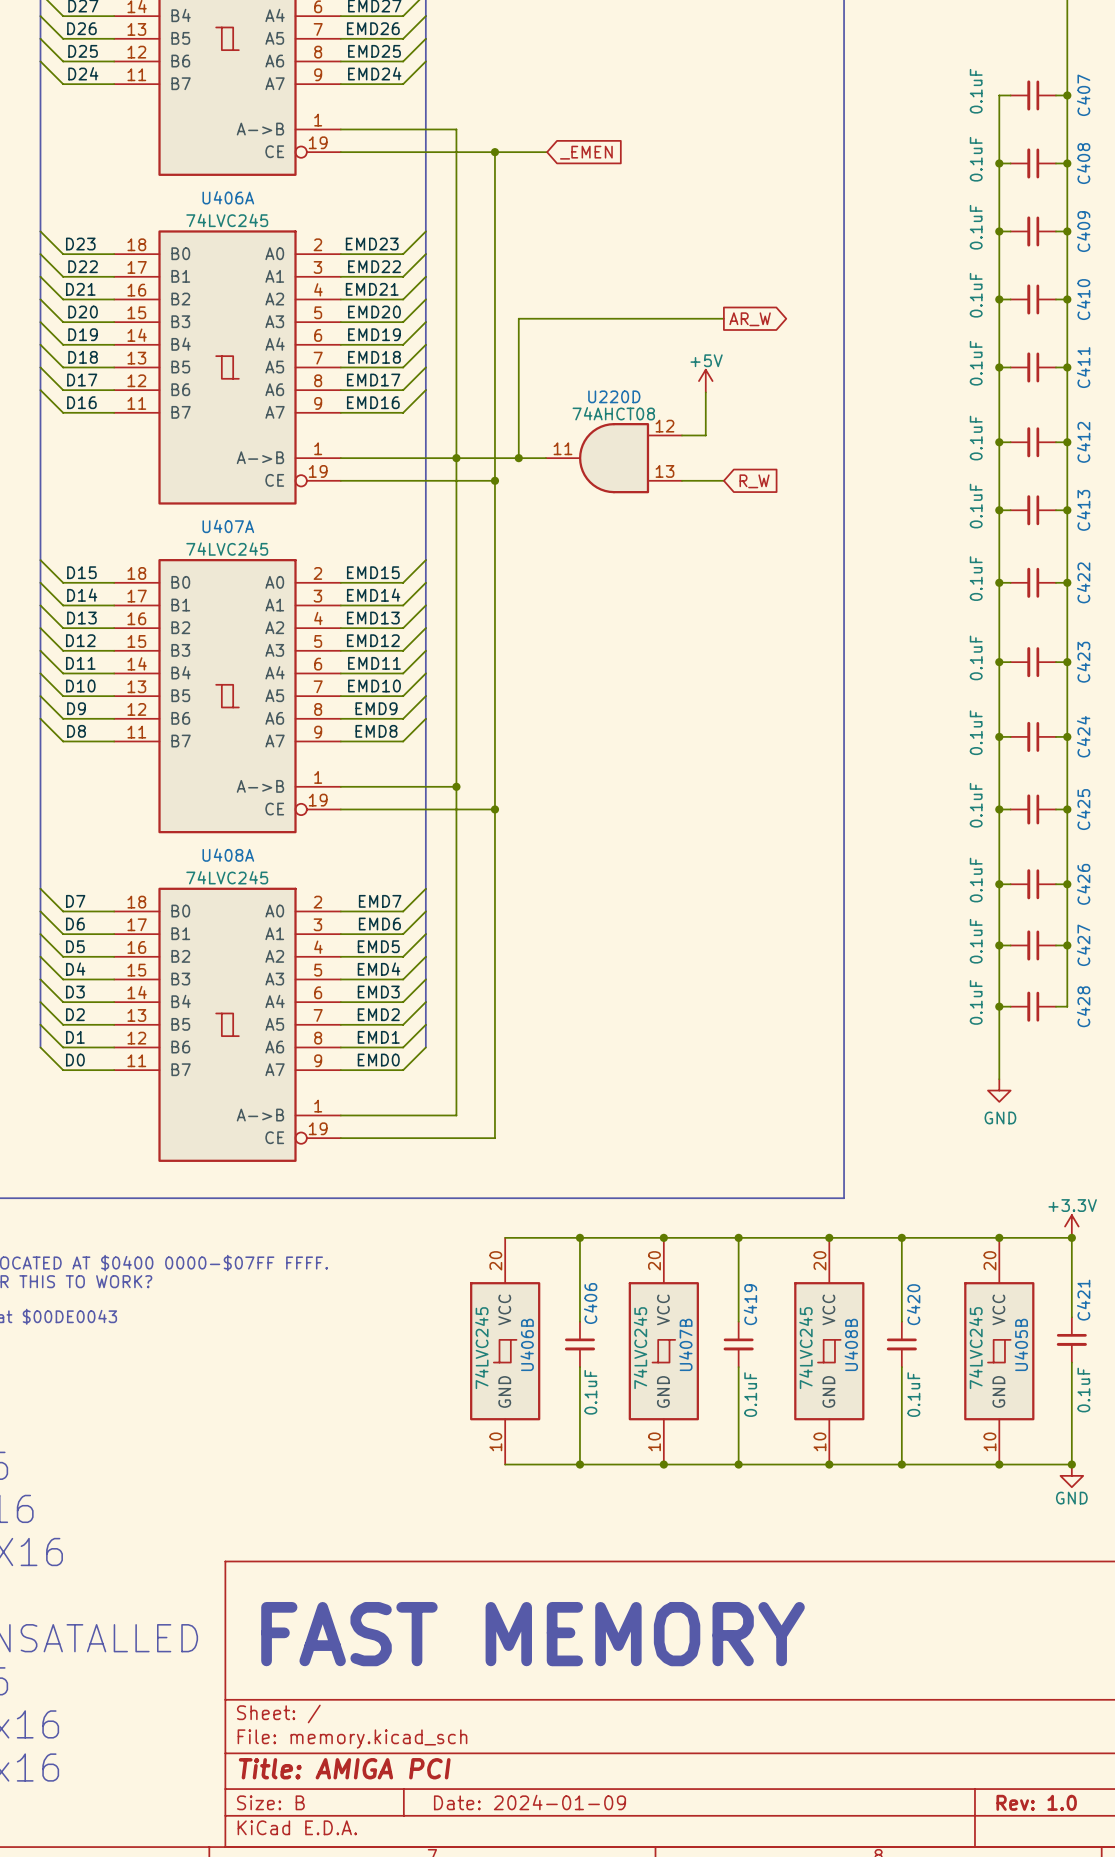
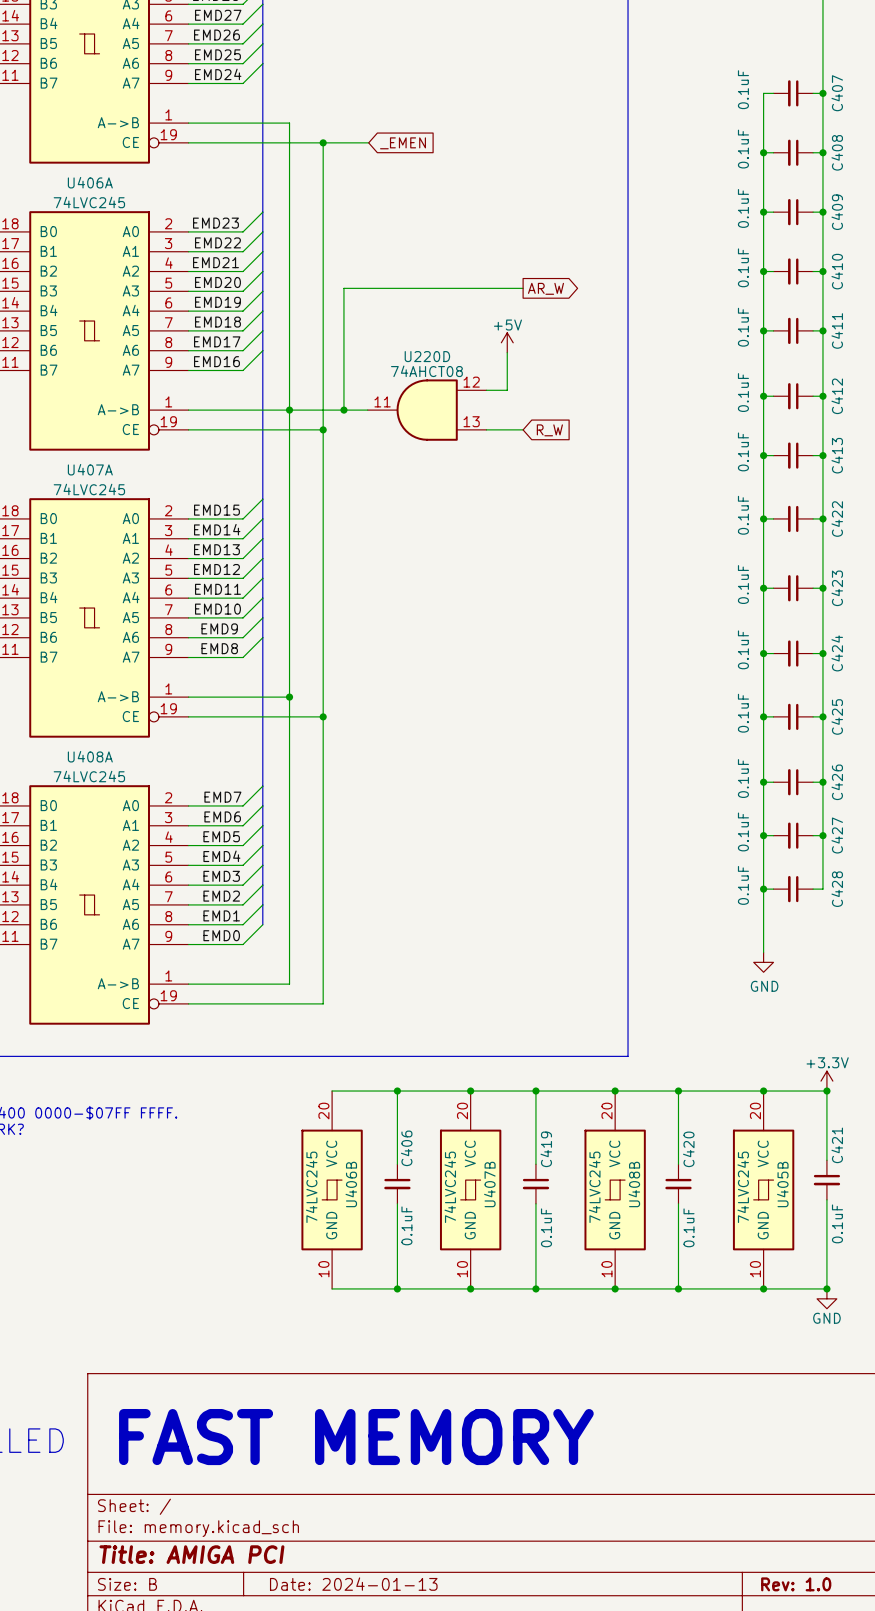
title block: Date: 2024-01-09 (530, 1802) -> Date: 2024-01-13 (353, 1584)

